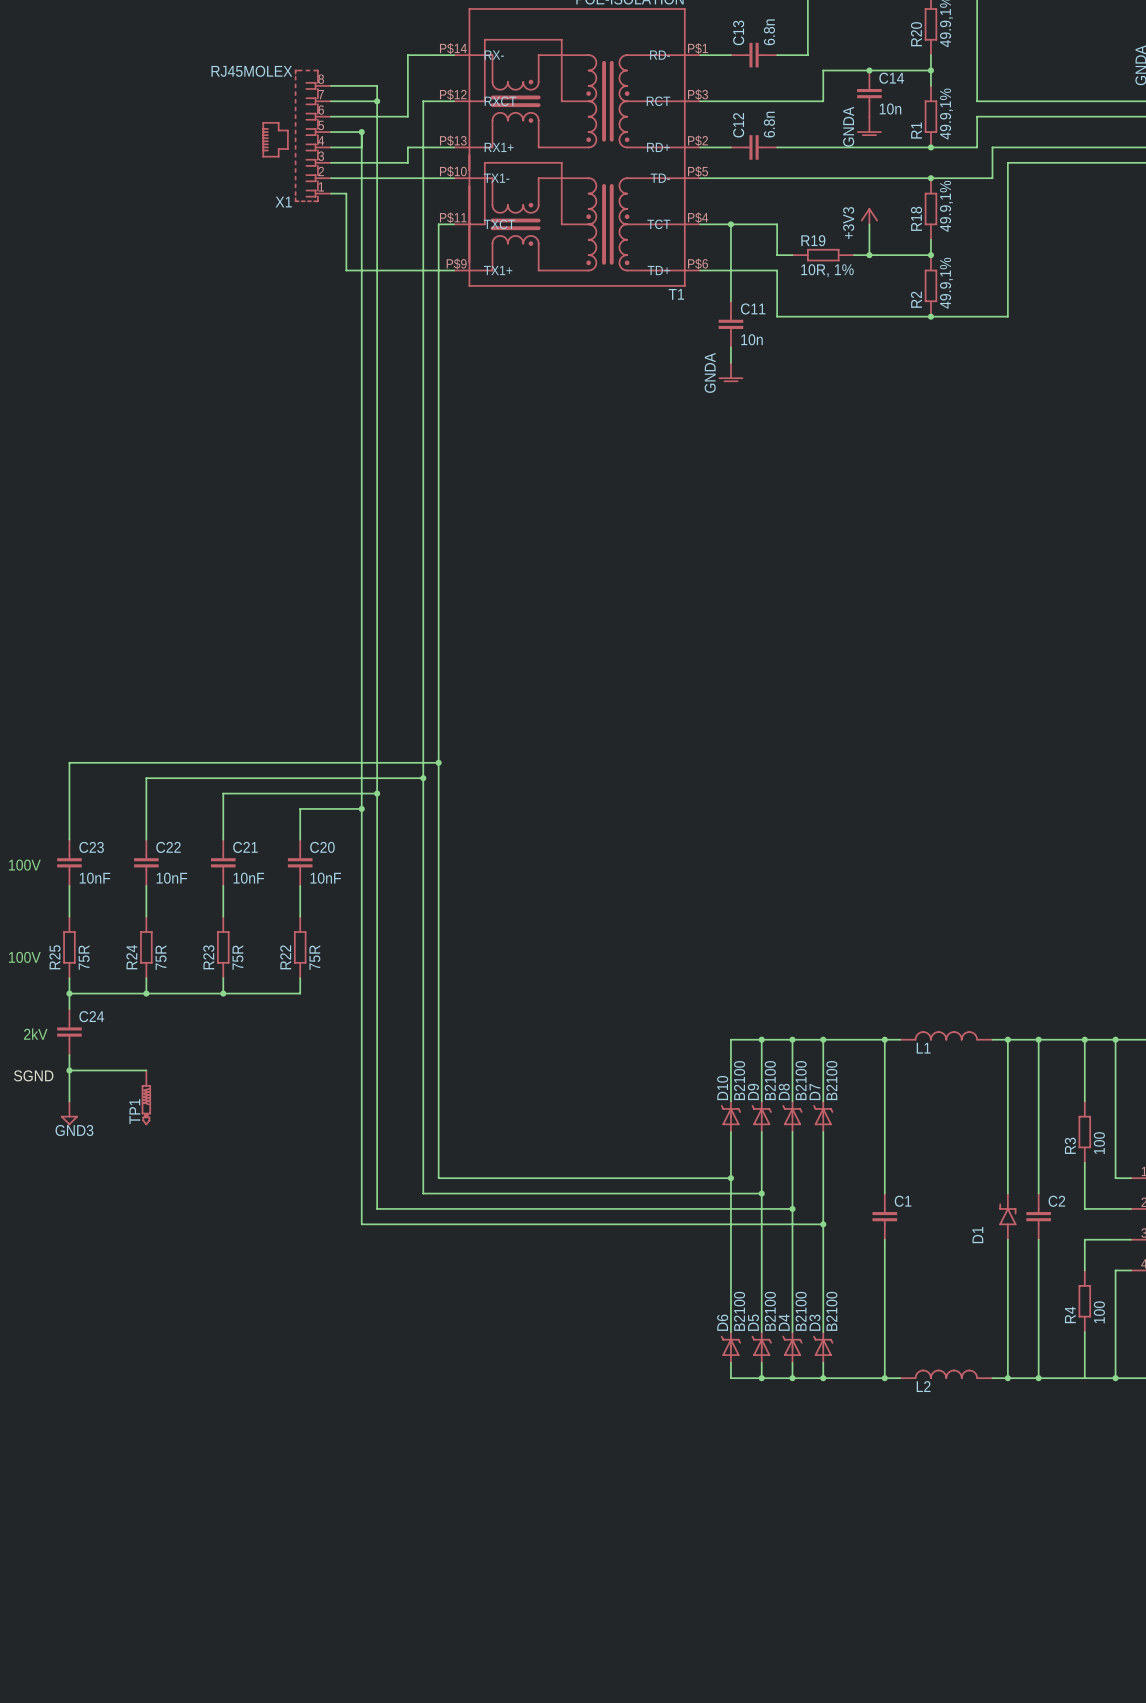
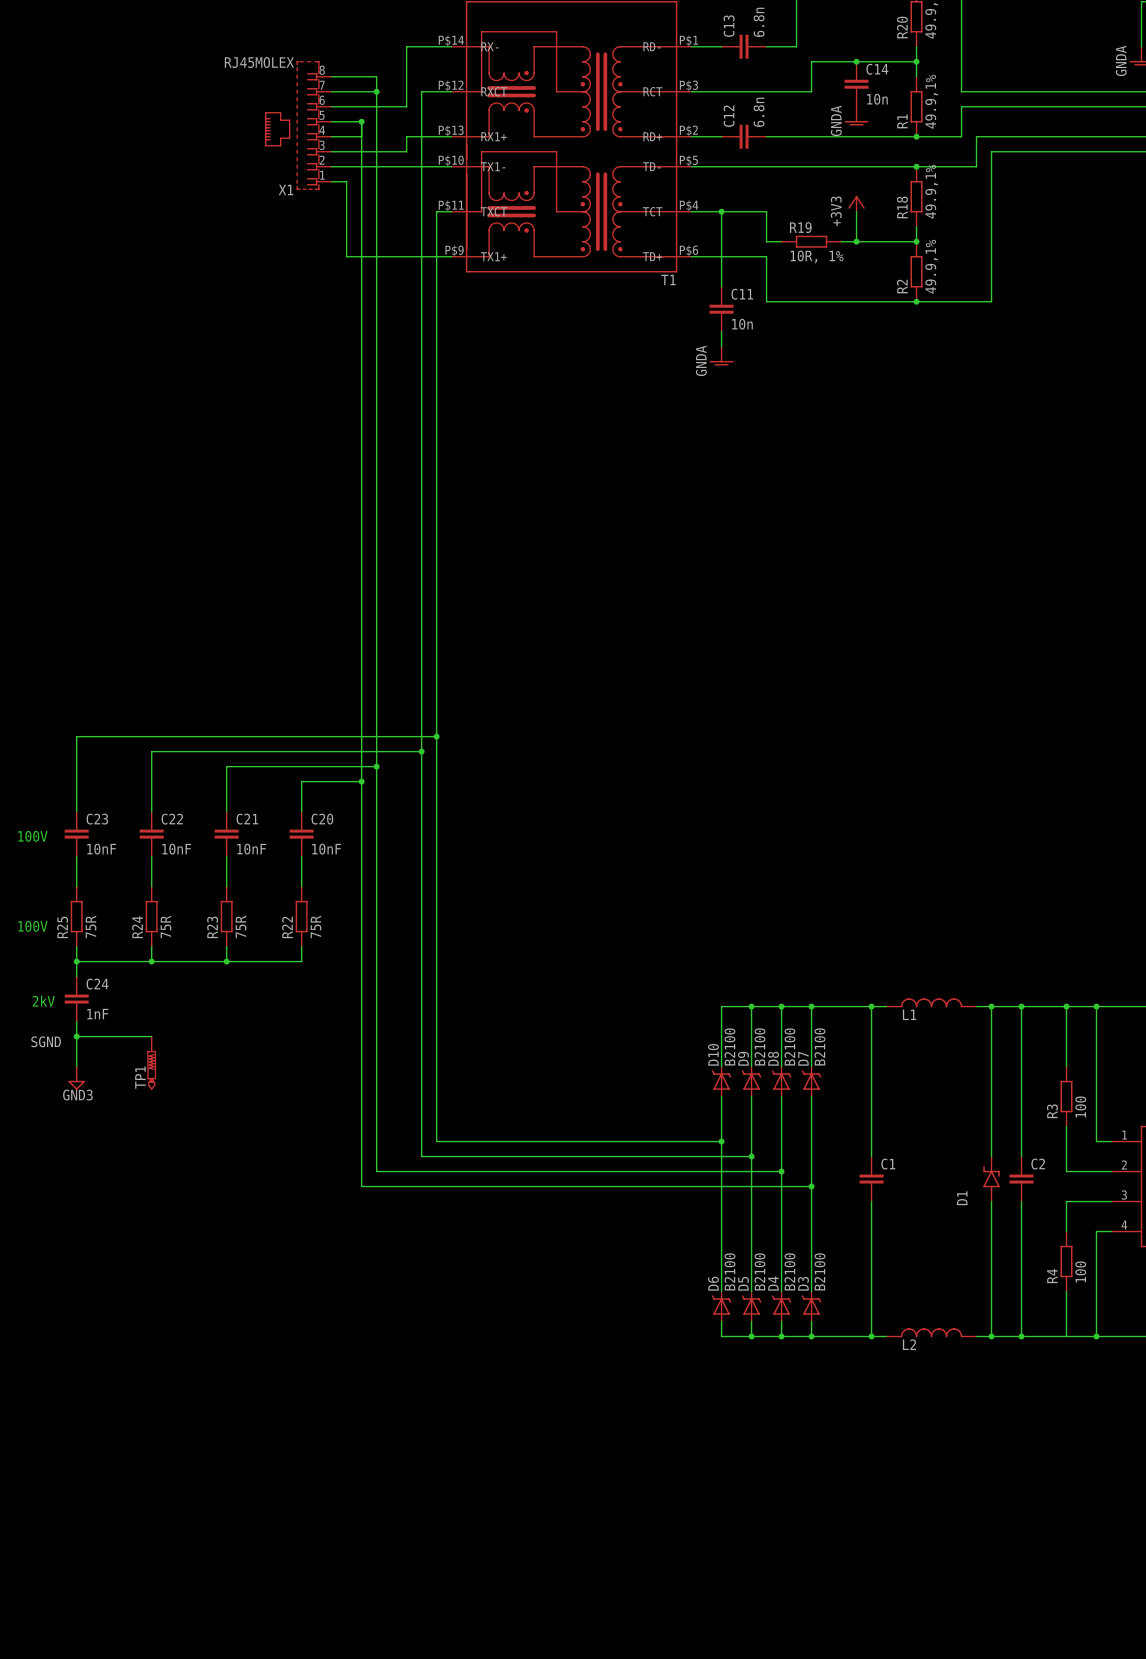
C24 value: none -> 1nF (97, 1014)

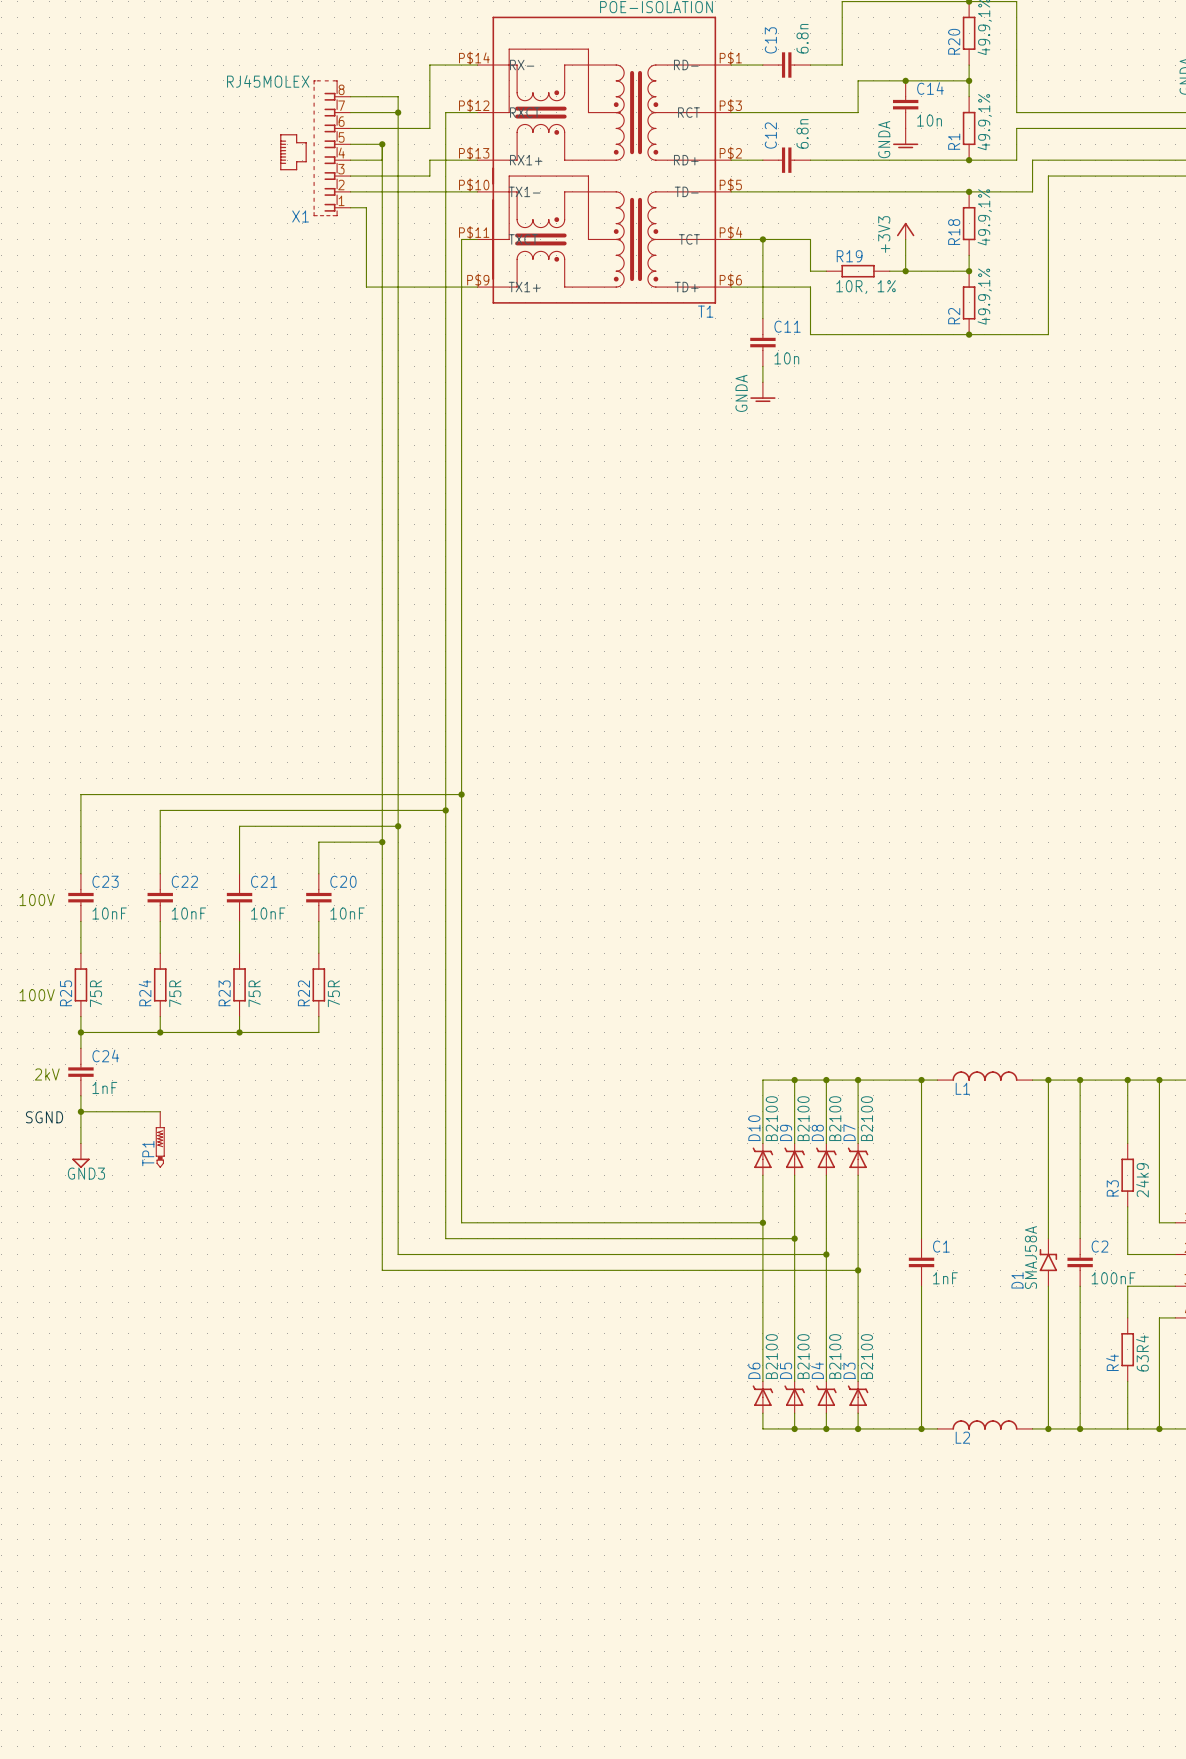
R3 value: 100 (1080, 1106) -> 24k9 (1142, 1180)
D1 value: none -> SMAJ58A (1030, 1257)
C1 value: none -> 1nF (945, 1278)
C2 value: none -> 100nF (1113, 1278)
R4 value: 100 (1080, 1271) -> 63R4 (1142, 1353)

